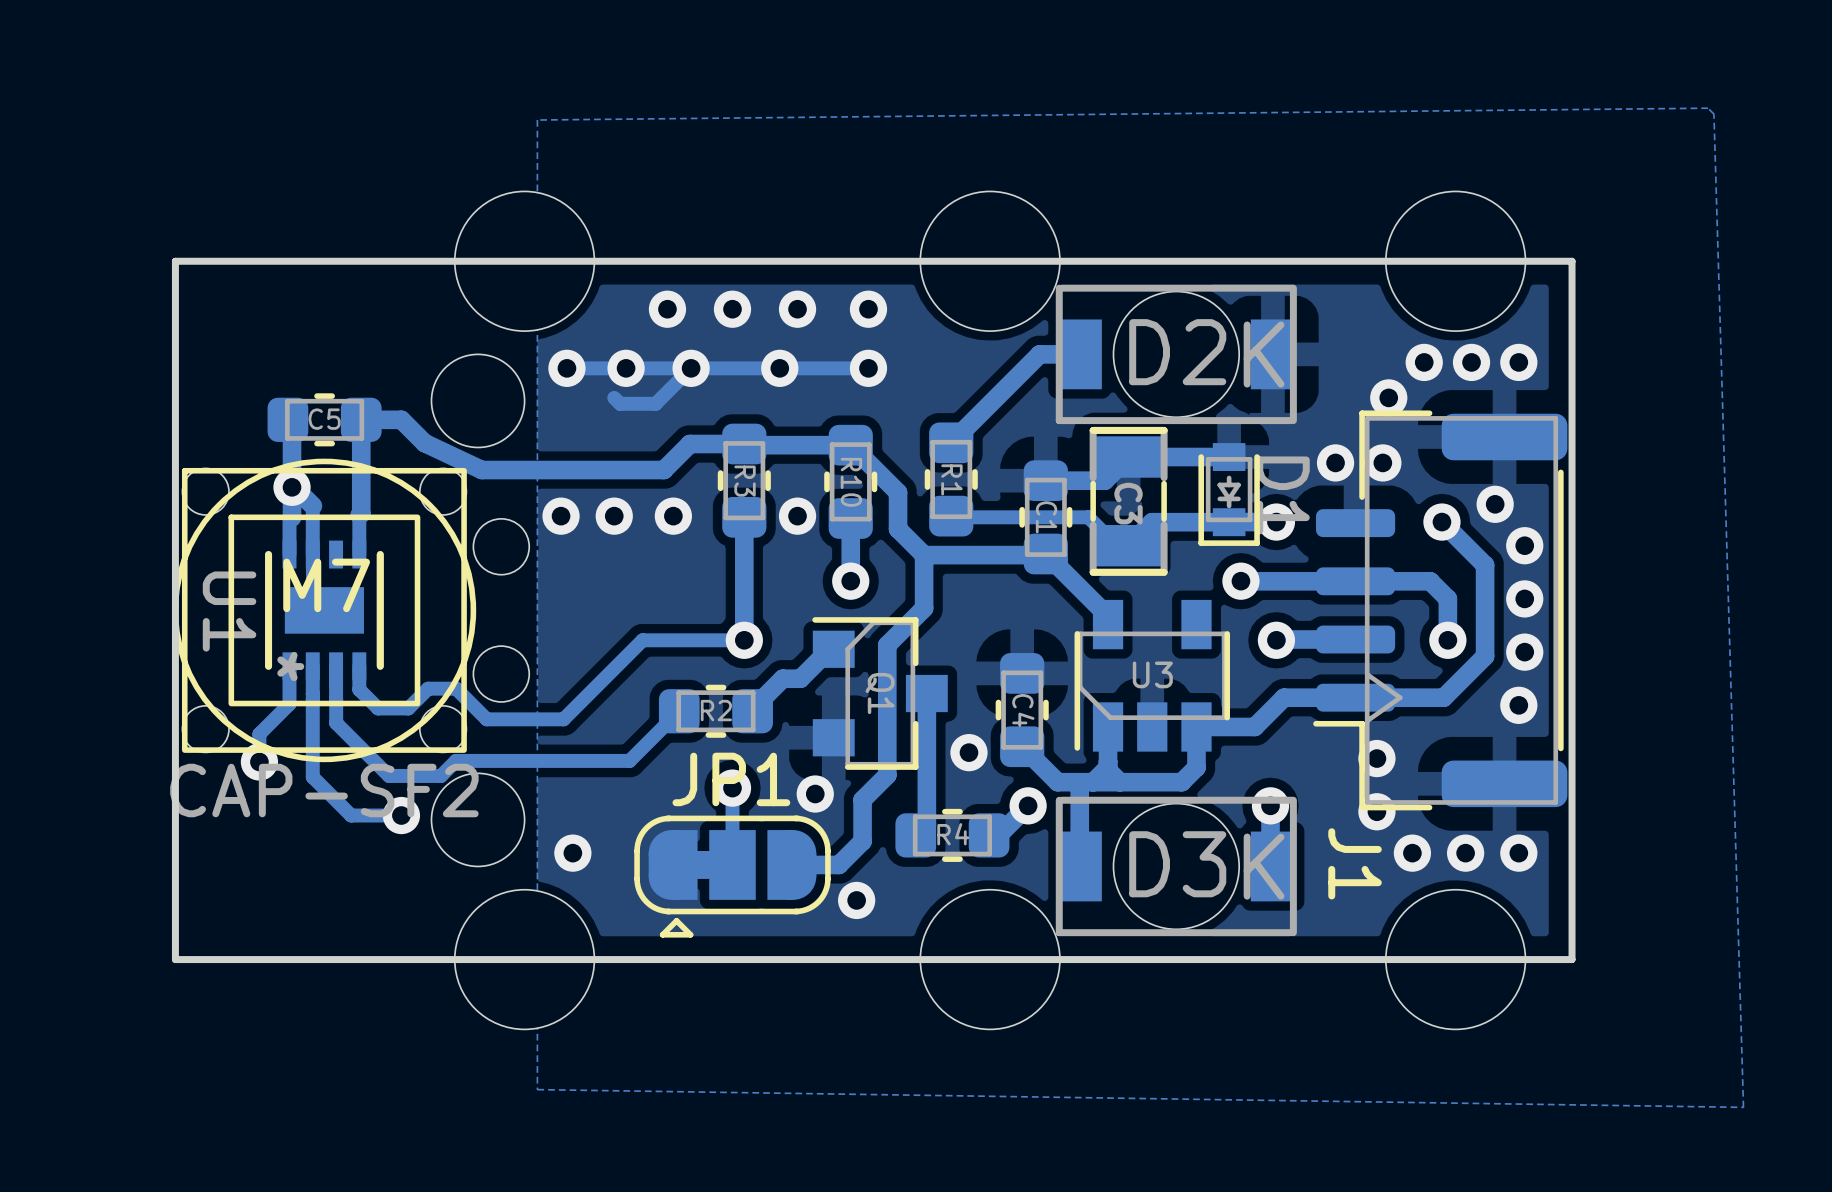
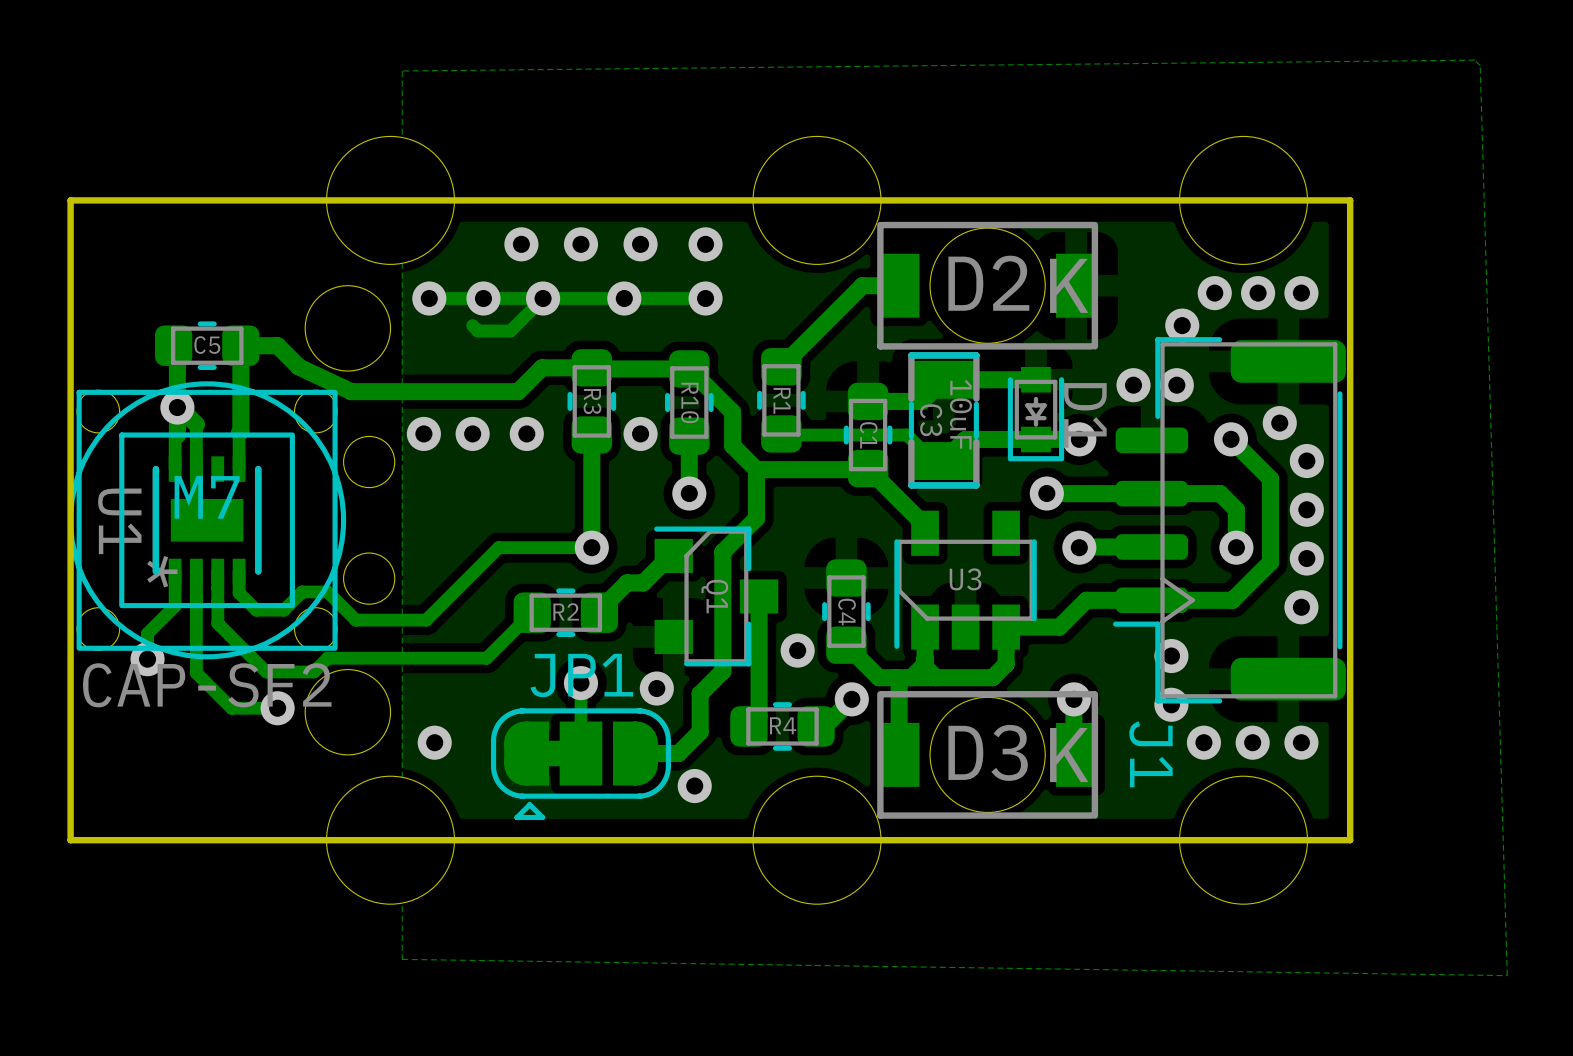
C3 value: none -> 10uF (960, 414)
C3 name position: C3 (1128, 503) -> C3 (931, 420)

